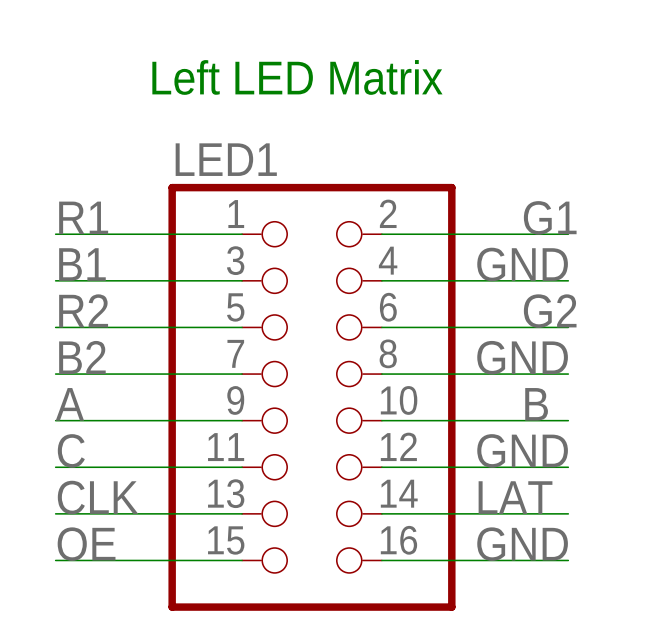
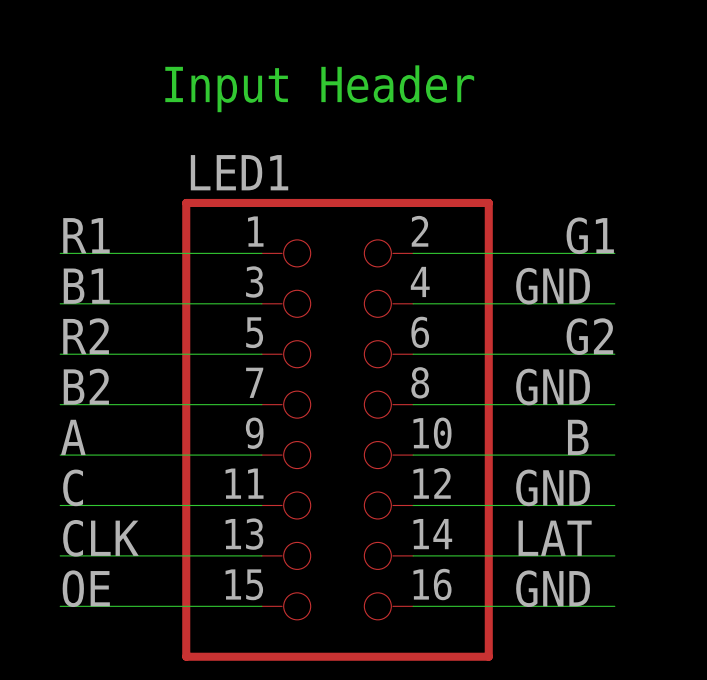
text: Left LED Matrix (297, 77) -> Input Header (319, 88)

